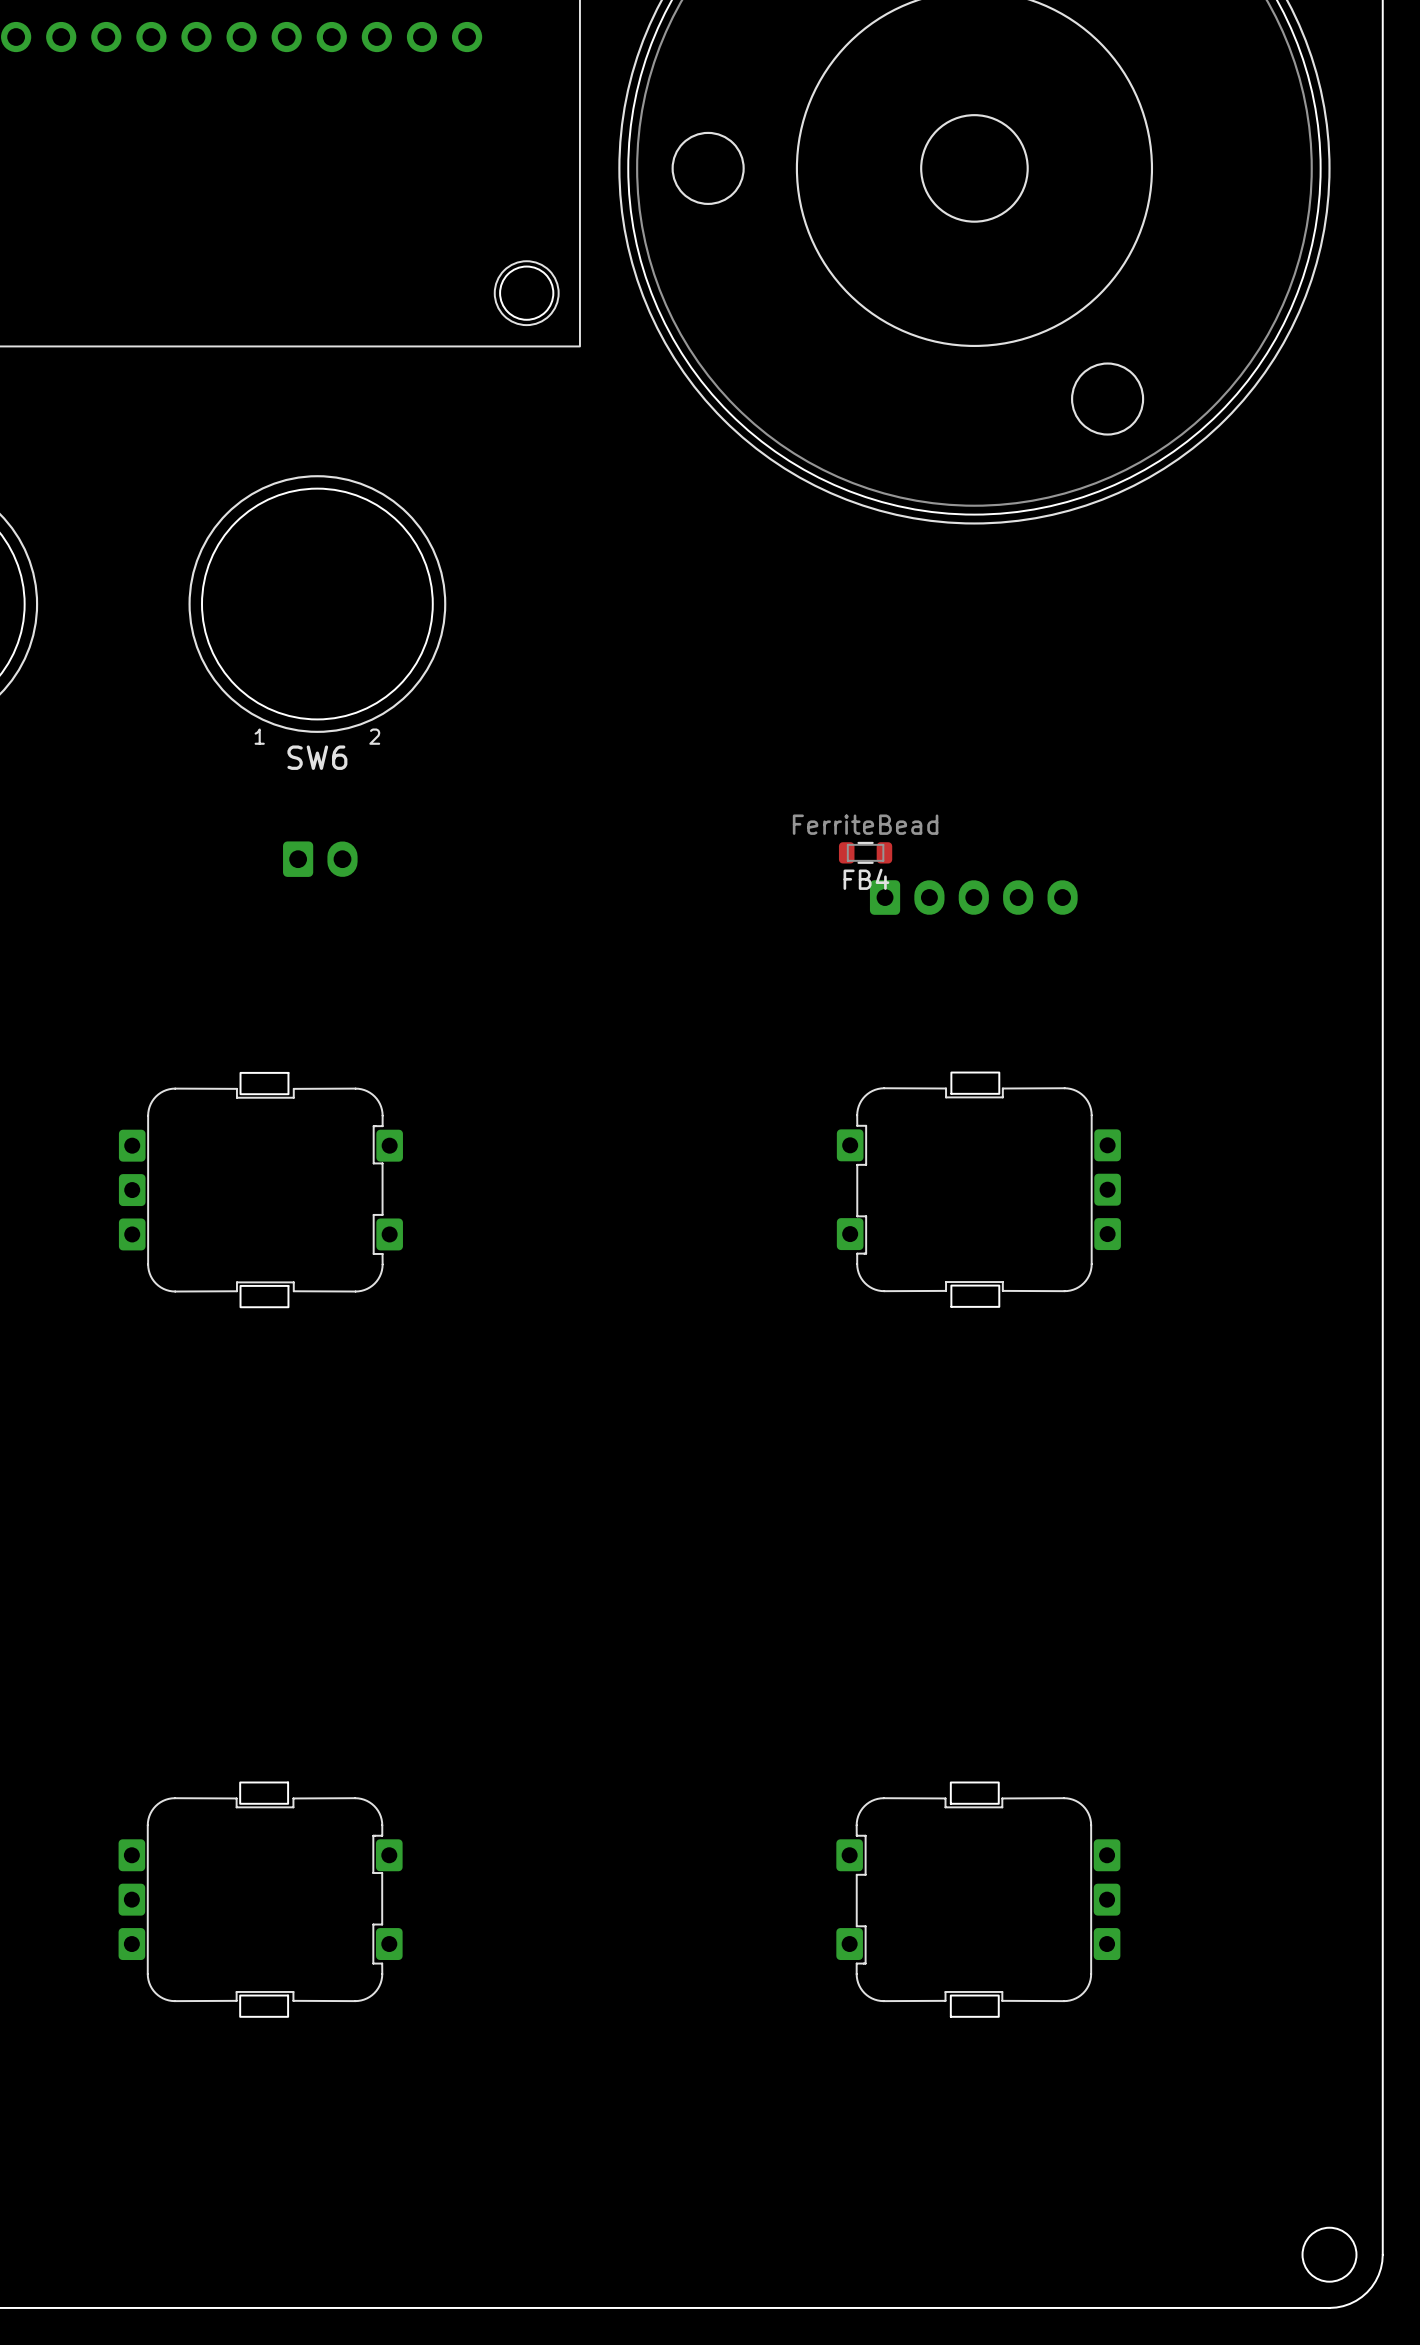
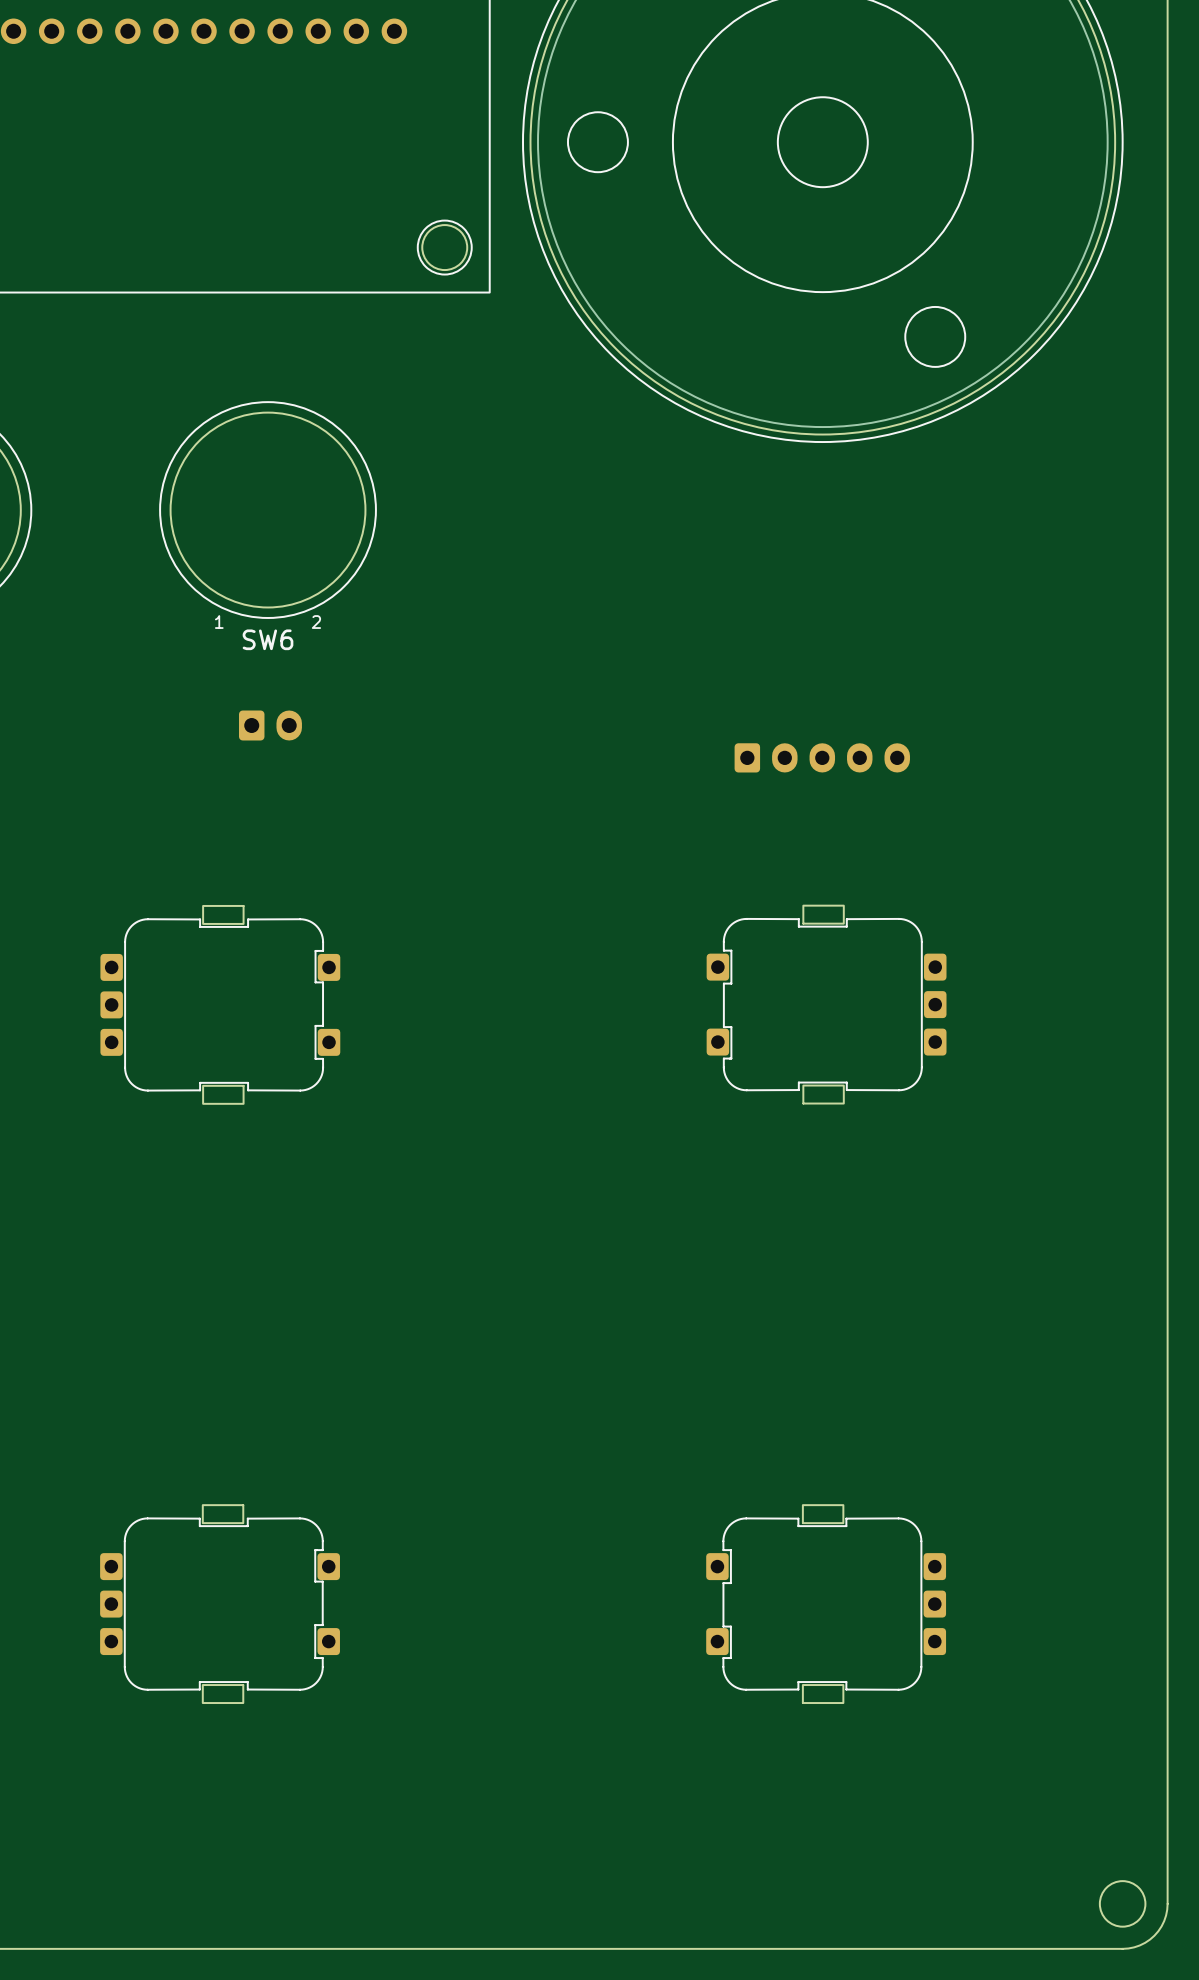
FB4: FerriteBead (865, 852) -> none

